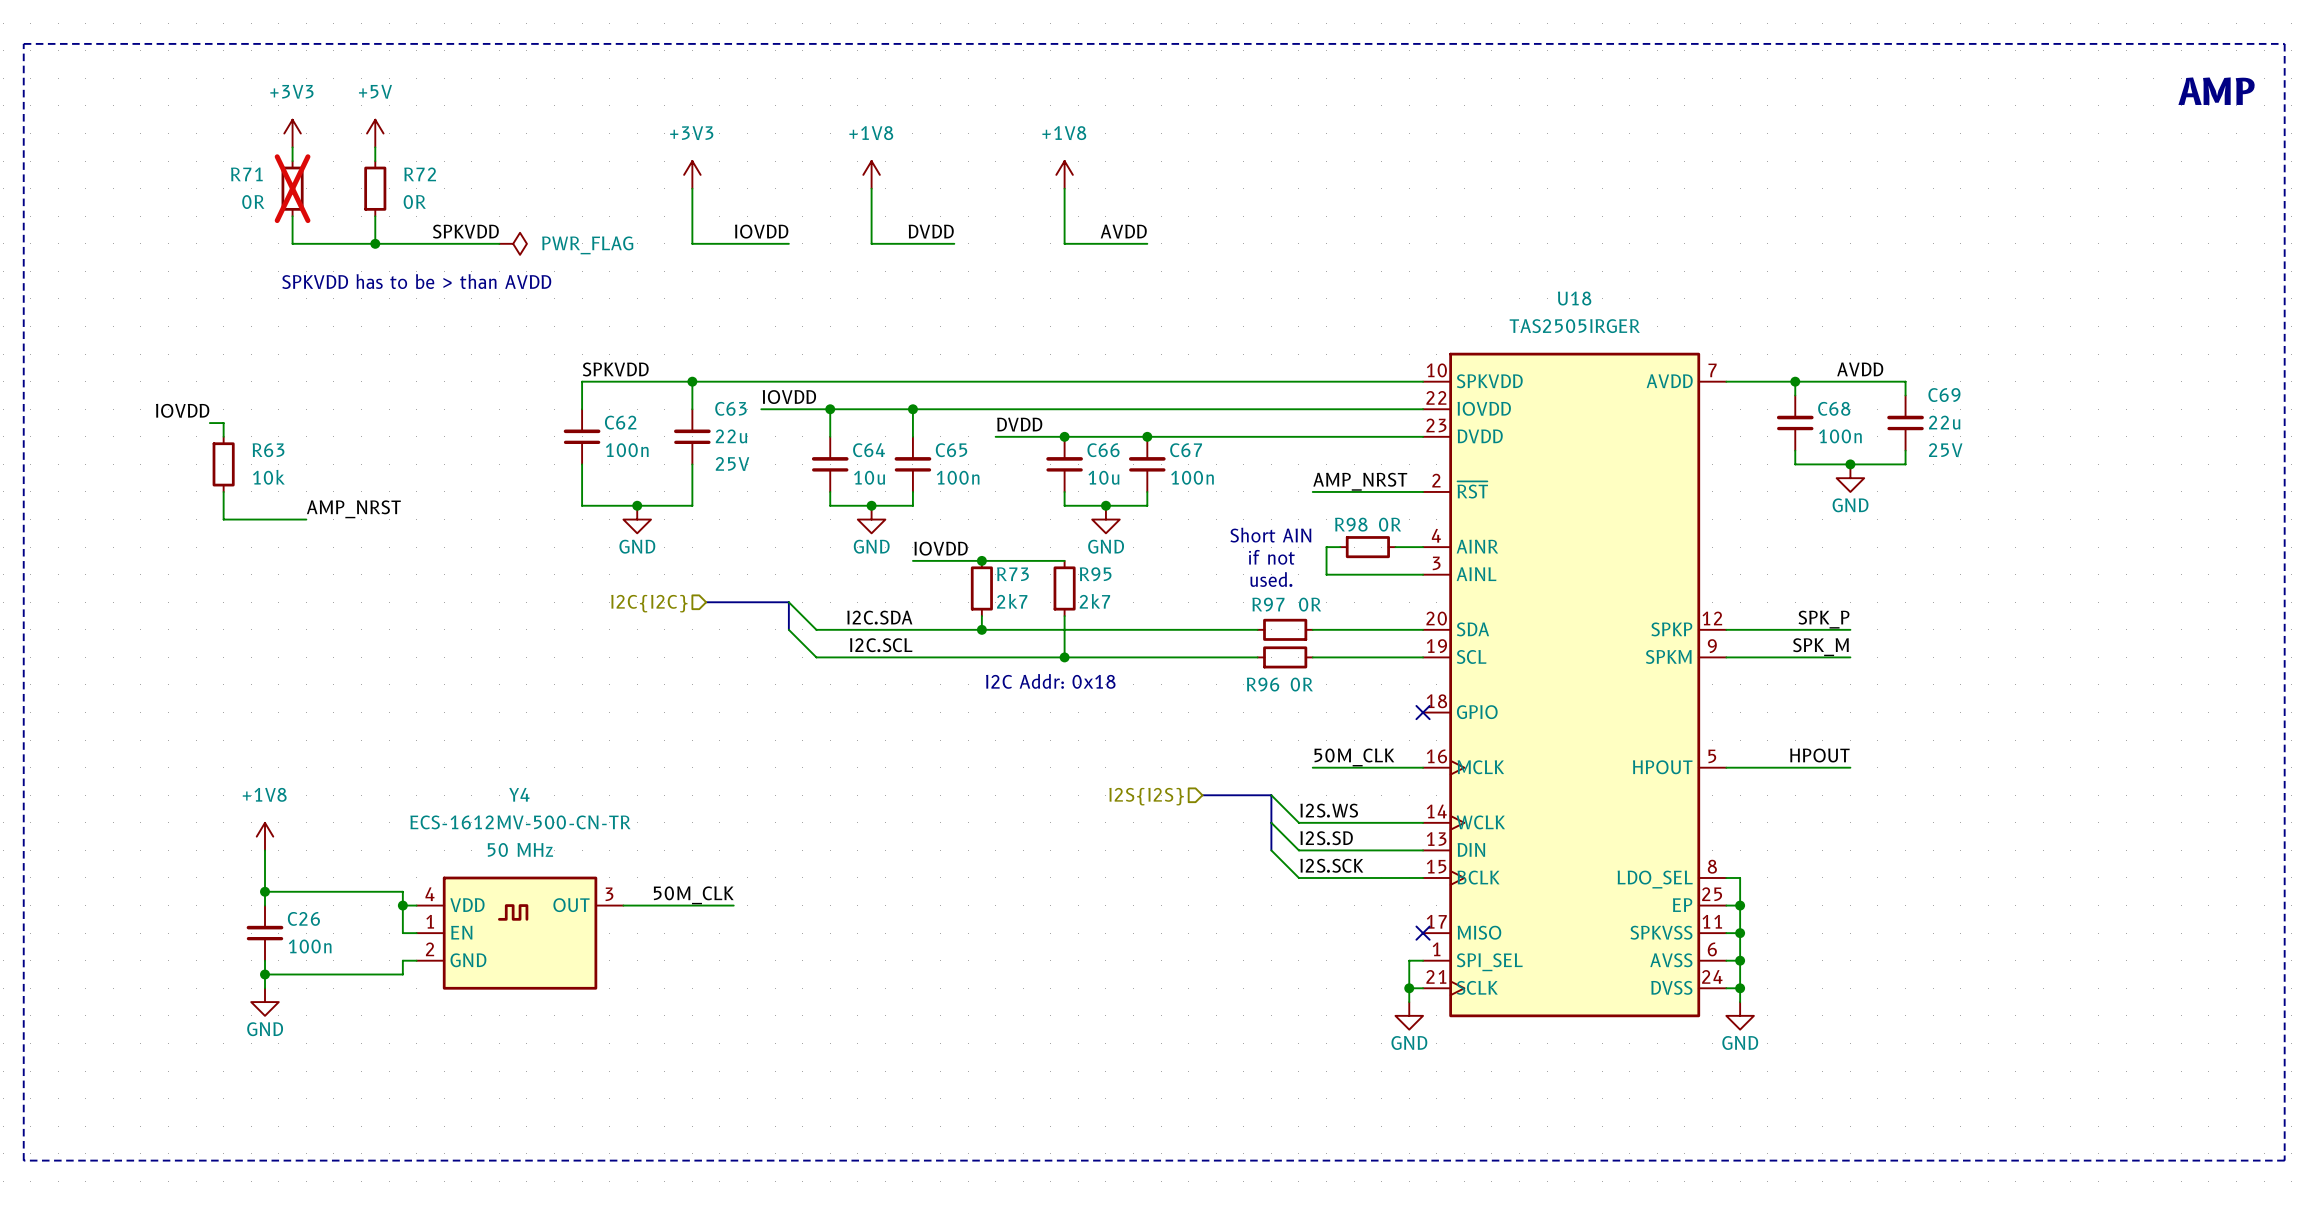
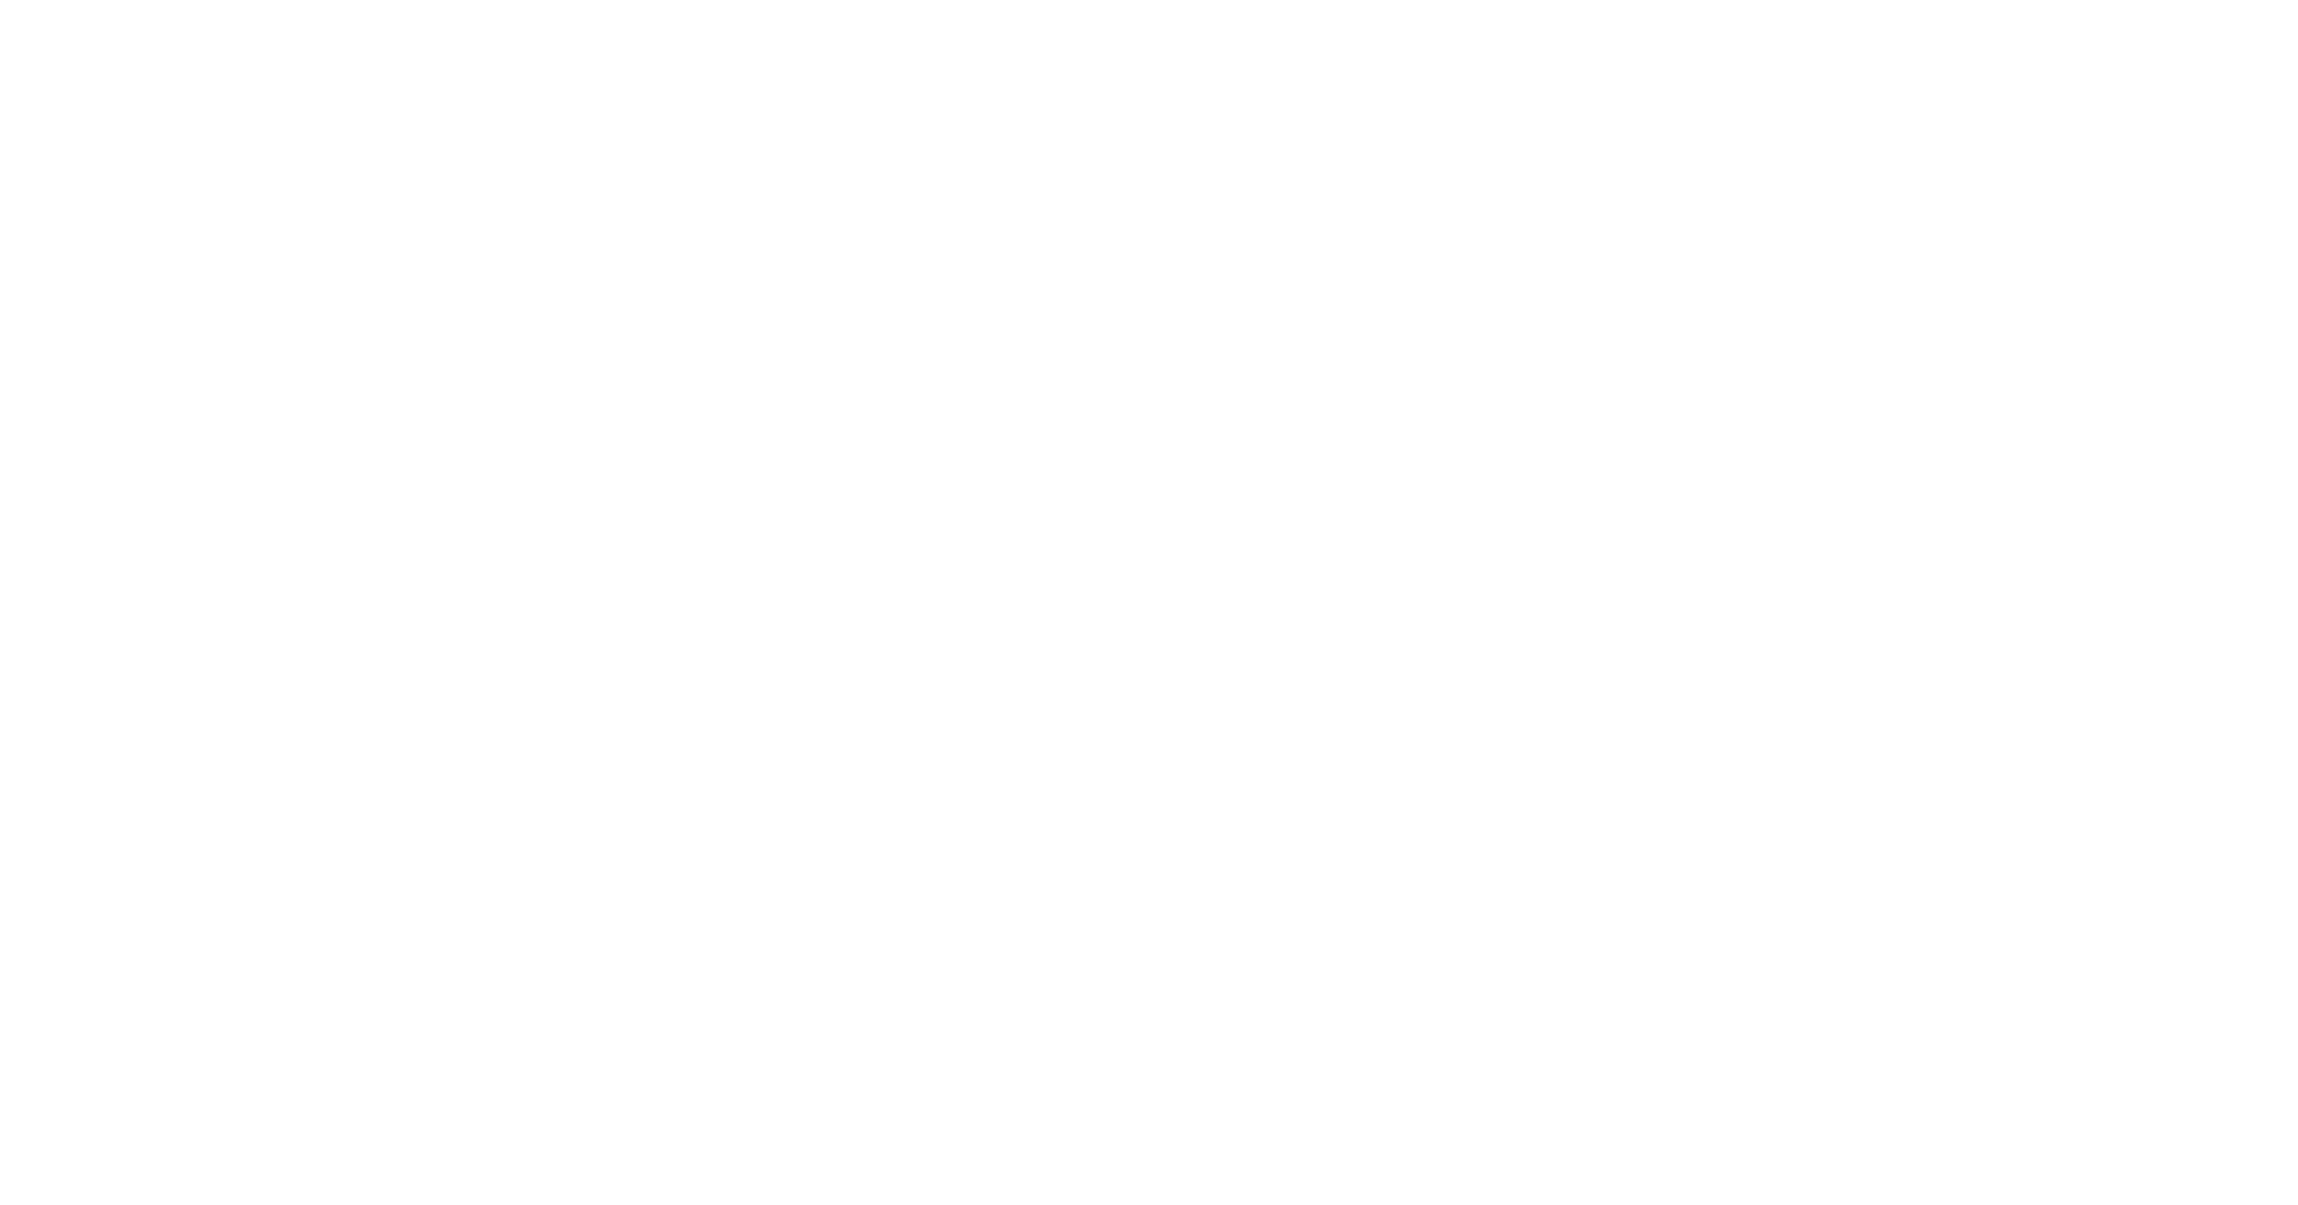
line: (23, 43) (2284, 43) (2284, 1160) (23, 1160) (23, 43) -> none
text: AMP (2216, 91) -> none
power symbol: +3V3 (292, 133) -> none
power symbol: +5V (375, 133) -> none
wire: (292, 147) (292, 161) -> none
wire: (375, 147) (375, 161) -> none
power symbol: +3V3 (692, 174) -> none
power symbol: +1V8 (871, 174) -> none
power symbol: +1V8 (1064, 174) -> none
R71: (292, 188) -> none
R72: (375, 188) -> none
wire: (692, 188) (692, 243) (788, 243) -> none
wire: (871, 188) (871, 243) (954, 243) -> none
wire: (1064, 188) (1064, 243) (1147, 243) -> none
wire: (292, 216) (292, 243) (499, 243) -> none
wire: (375, 216) (375, 243) -> none
label: SPKVDD (465, 231) -> none
label: IOVDD (761, 231) -> none
label: DVDD (931, 231) -> none
label: AVDD (1123, 231) -> none
junction: (375, 243) -> none
power symbol: PWR_FLAG (513, 243) -> none
text: SPKVDD has to be > than AVDD (416, 281) -> none
label: SPKVDD (615, 369) -> none
label: AVDD (1860, 369) -> none
wire: (692, 381) (692, 409) -> none
junction: (692, 381) -> none
wire: (1423, 381) (582, 381) (582, 409) -> none
wire: (1726, 381) (1905, 381) (1905, 395) -> none
wire: (1795, 381) (1795, 395) -> none
junction: (1795, 381) -> none
label: IOVDD (789, 397) -> none
wire: (761, 409) (1423, 409) -> none
wire: (830, 409) (830, 436) -> none
junction: (830, 409) -> none
wire: (912, 409) (912, 436) -> none
junction: (912, 409) -> none
label: IOVDD (182, 410) -> none
wire: (209, 423) (223, 423) (223, 436) -> none
C68: (1795, 423) -> none
C69: (1905, 423) -> none
label: DVDD (1019, 424) -> none
C62: (582, 436) -> none
C63: (692, 436) -> none
wire: (995, 436) (1423, 436) -> none
junction: (1064, 436) -> none
junction: (1147, 436) -> none
wire: (1795, 450) (1795, 464) (1905, 464) (1905, 450) -> none
R63: (223, 464) -> none
wire: (582, 464) (582, 505) (692, 505) (692, 464) -> none
C64: (830, 464) -> none
C65: (912, 464) -> none
C66: (1064, 464) -> none
C67: (1147, 464) -> none
junction: (1850, 464) -> none
power symbol: GND (1850, 478) -> none
label: AMP_NRST (1360, 481) -> none
wire: (223, 491) (223, 519) (306, 519) -> none
wire: (830, 491) (830, 505) (912, 505) (912, 491) -> none
wire: (1064, 491) (1064, 505) (1147, 505) (1147, 491) -> none
wire: (1312, 491) (1423, 491) -> none
junction: (637, 505) -> none
junction: (871, 505) -> none
junction: (1105, 505) -> none
label: AMP_NRST (353, 509) -> none
power symbol: GND (637, 519) -> none
power symbol: GND (871, 519) -> none
power symbol: GND (1105, 519) -> none
text: Short AIN (1270, 535) -> none
wire: (1340, 547) (1326, 547) (1326, 574) (1423, 574) -> none
R98: (1367, 547) -> none
wire: (1395, 547) (1423, 547) -> none
label: IOVDD (941, 548) -> none
text: if not (1271, 557) -> none
wire: (912, 560) (1064, 560) -> none
junction: (981, 560) -> none
text: used. (1271, 579) -> none
R73: (981, 588) -> none
R95: (1064, 588) -> none
bus: (706, 602) (788, 602) (788, 629) -> none
wire: (788, 602) (816, 629) (1257, 629) -> none
hierarchical label: I2C{I2C} (649, 603) -> none
wire: (981, 616) (981, 629) -> none
wire: (1064, 616) (1064, 657) -> none
label: I2C.SDA (879, 617) -> none
label: SPK_P (1823, 619) -> none
wire: (788, 629) (816, 657) (1257, 657) -> none
junction: (981, 629) -> none
R97: (1285, 629) -> none
wire: (1312, 629) (1423, 629) -> none
wire: (1726, 629) (1850, 629) -> none
label: I2C.SCL (881, 645) -> none
label: SPK_M (1820, 647) -> none
junction: (1064, 657) -> none
R96: (1285, 657) -> none
wire: (1312, 657) (1423, 657) -> none
wire: (1726, 657) (1850, 657) -> none
text: I2C Addr: 0x18 (1050, 681) -> none
U18: (1574, 684) -> none
no-connect mark: (1423, 712) -> none
label: HPOUT (1819, 755) -> none
label: 50M_CLK (1354, 757) -> none
wire: (1312, 767) (1423, 767) -> none
wire: (1726, 767) (1850, 767) -> none
bus: (1202, 795) (1271, 795) (1271, 850) -> none
wire: (1271, 795) (1298, 822) (1423, 822) -> none
hierarchical label: I2S{I2S} (1146, 796) -> none
label: I2S.WS (1329, 810) -> none
wire: (1271, 822) (1298, 850) (1423, 850) -> none
power symbol: +1V8 (265, 836) -> none
label: I2S.SD (1326, 838) -> none
wire: (265, 850) (265, 905) -> none
wire: (1271, 850) (1298, 877) (1423, 877) -> none
label: I2S.SCK (1331, 865) -> none
wire: (1726, 877) (1740, 877) (1740, 1002) -> none
wire: (265, 891) (402, 891) (402, 933) (416, 933) -> none
junction: (265, 891) -> none
label: 50M_CLK (693, 895) -> none
wire: (402, 905) (416, 905) -> none
junction: (402, 905) -> none
wire: (623, 905) (733, 905) -> none
wire: (1726, 905) (1740, 905) -> none
junction: (1740, 905) -> none
C26: (265, 933) -> none
Y4: (520, 933) -> none
no-connect mark: (1423, 933) -> none
wire: (1726, 933) (1740, 933) -> none
junction: (1740, 933) -> none
wire: (265, 960) (265, 988) -> none
wire: (416, 960) (402, 960) (402, 974) (265, 974) -> none
wire: (1423, 960) (1409, 960) (1409, 1002) -> none
wire: (1726, 960) (1740, 960) -> none
junction: (1740, 960) -> none
junction: (265, 974) -> none
wire: (1409, 988) (1423, 988) -> none
junction: (1409, 988) -> none
wire: (1726, 988) (1740, 988) -> none
junction: (1740, 988) -> none
power symbol: GND (265, 1002) -> none
power symbol: GND (1409, 1015) -> none
power symbol: GND (1740, 1015) -> none

